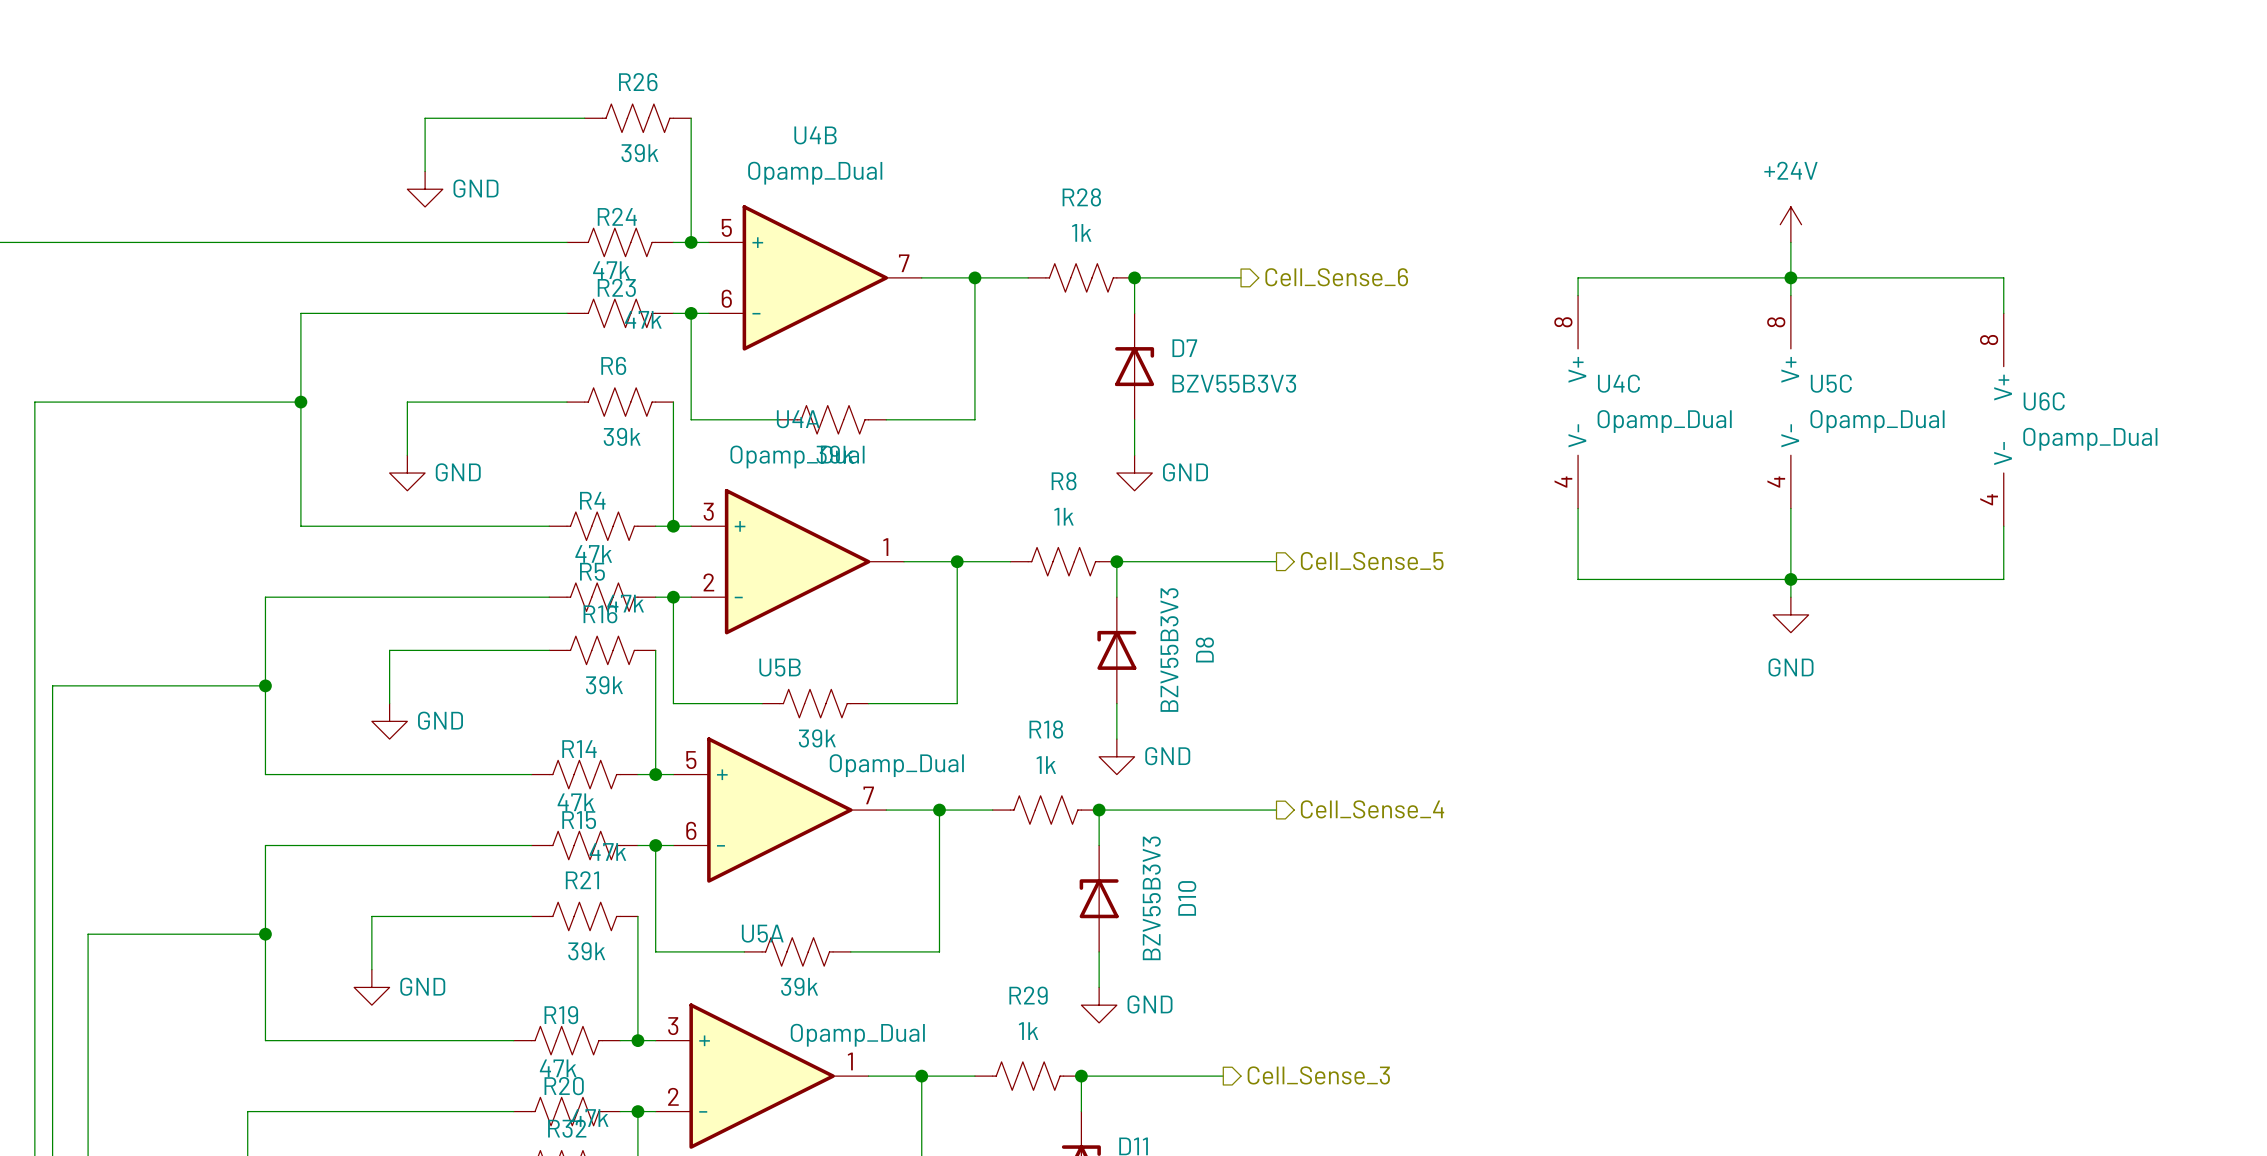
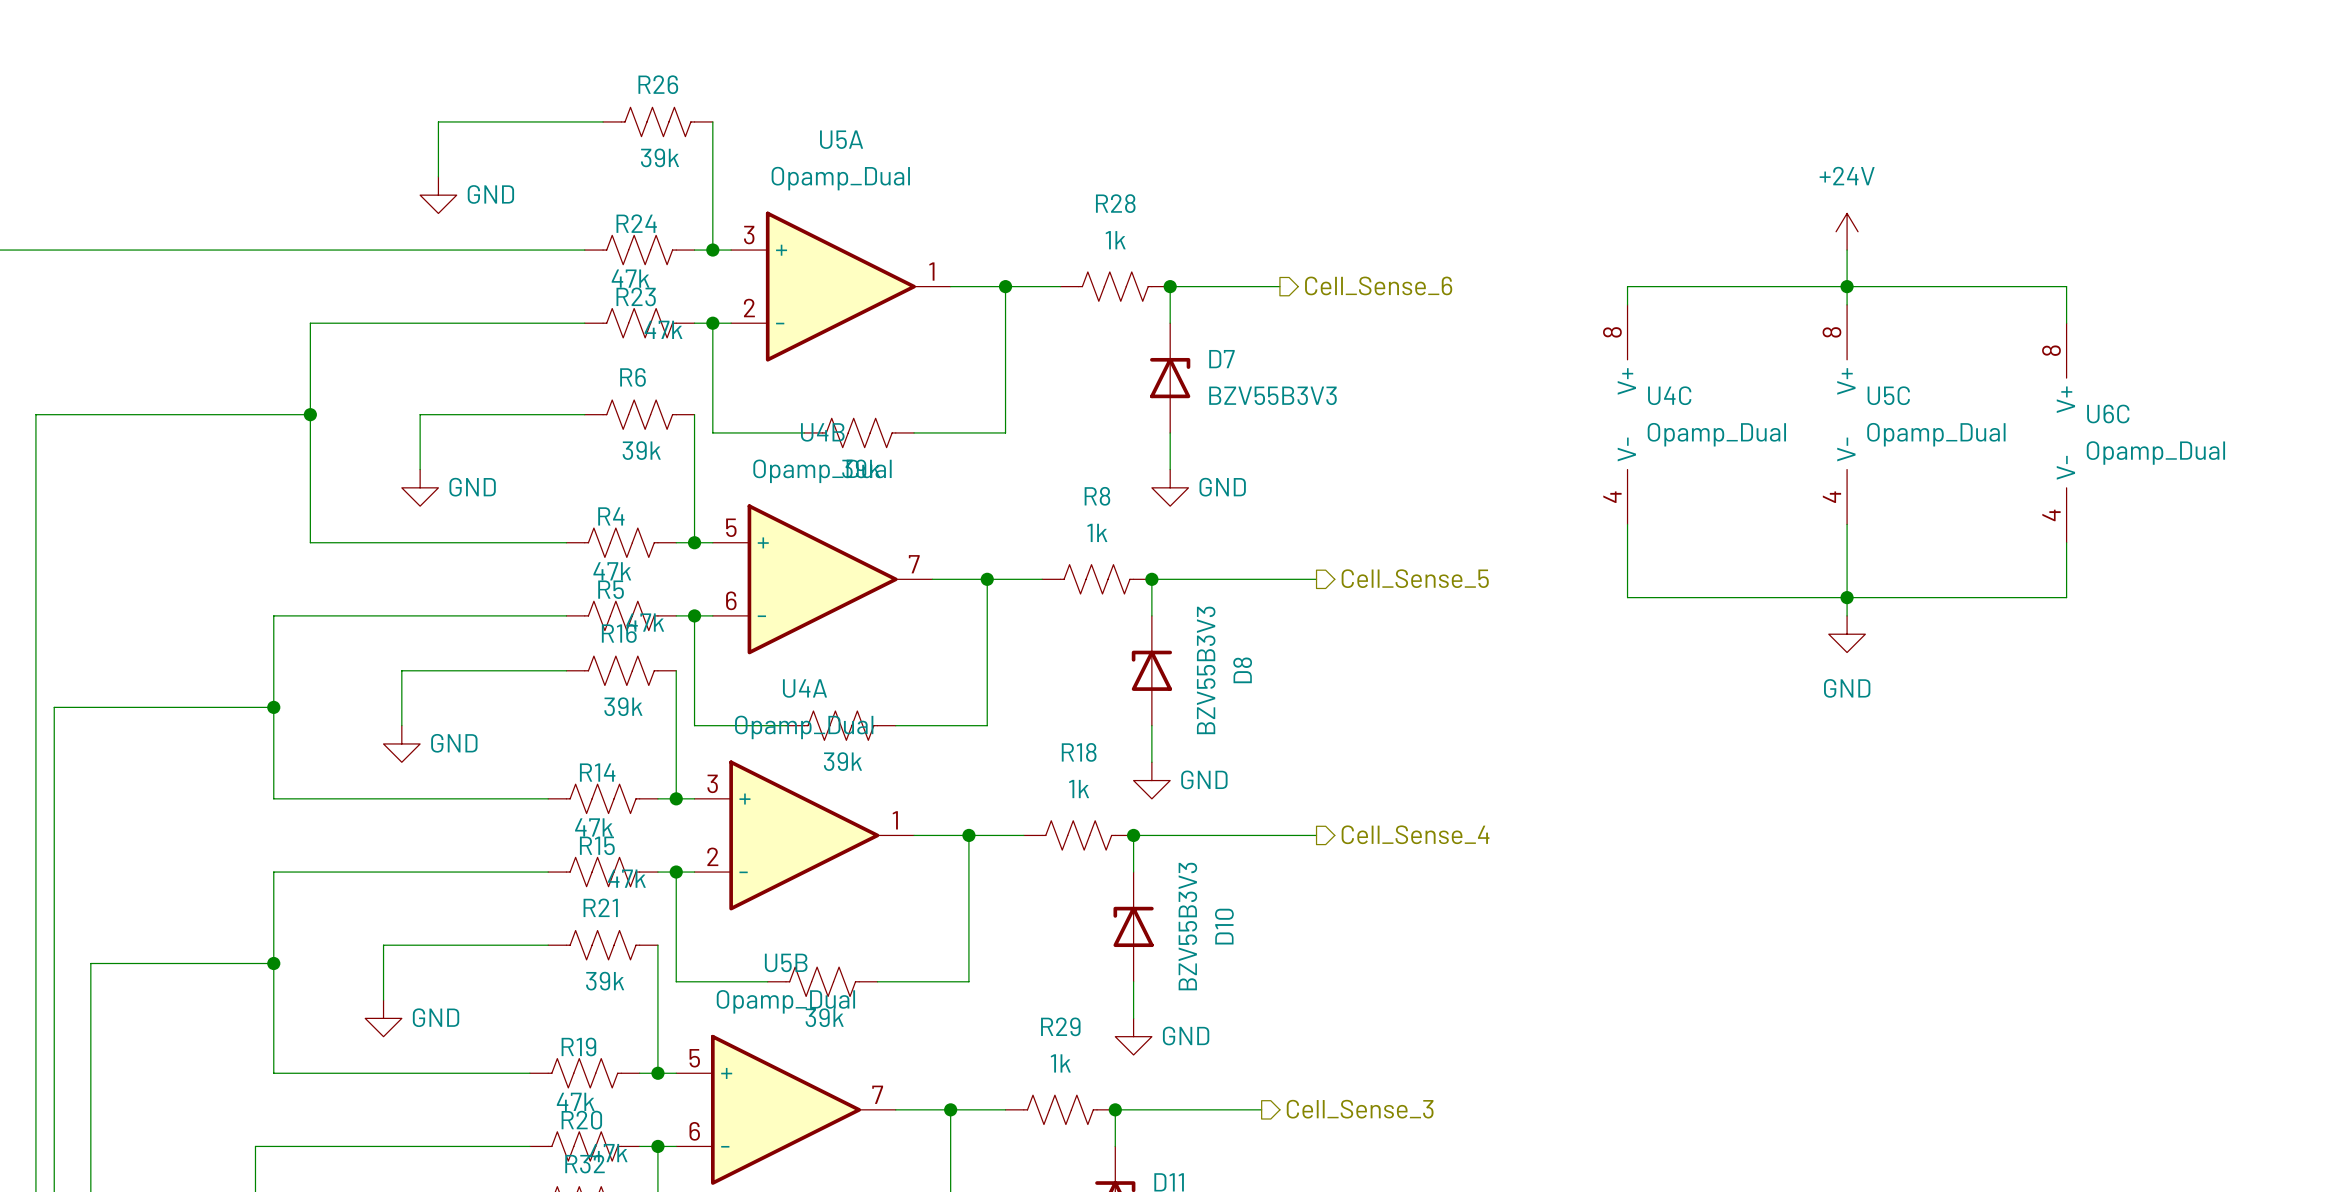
U4B position: (815, 277) -> (822, 579)
U4A position: (797, 561) -> (804, 835)
U5B value position: Opamp_Dual (896, 765) -> Opamp_Dual (785, 1001)
U5B position: (779, 810) -> (786, 1109)
U5A value position: Opamp_Dual (857, 1035) -> Opamp_Dual (840, 178)
U5A position: (762, 1076) -> (840, 286)

